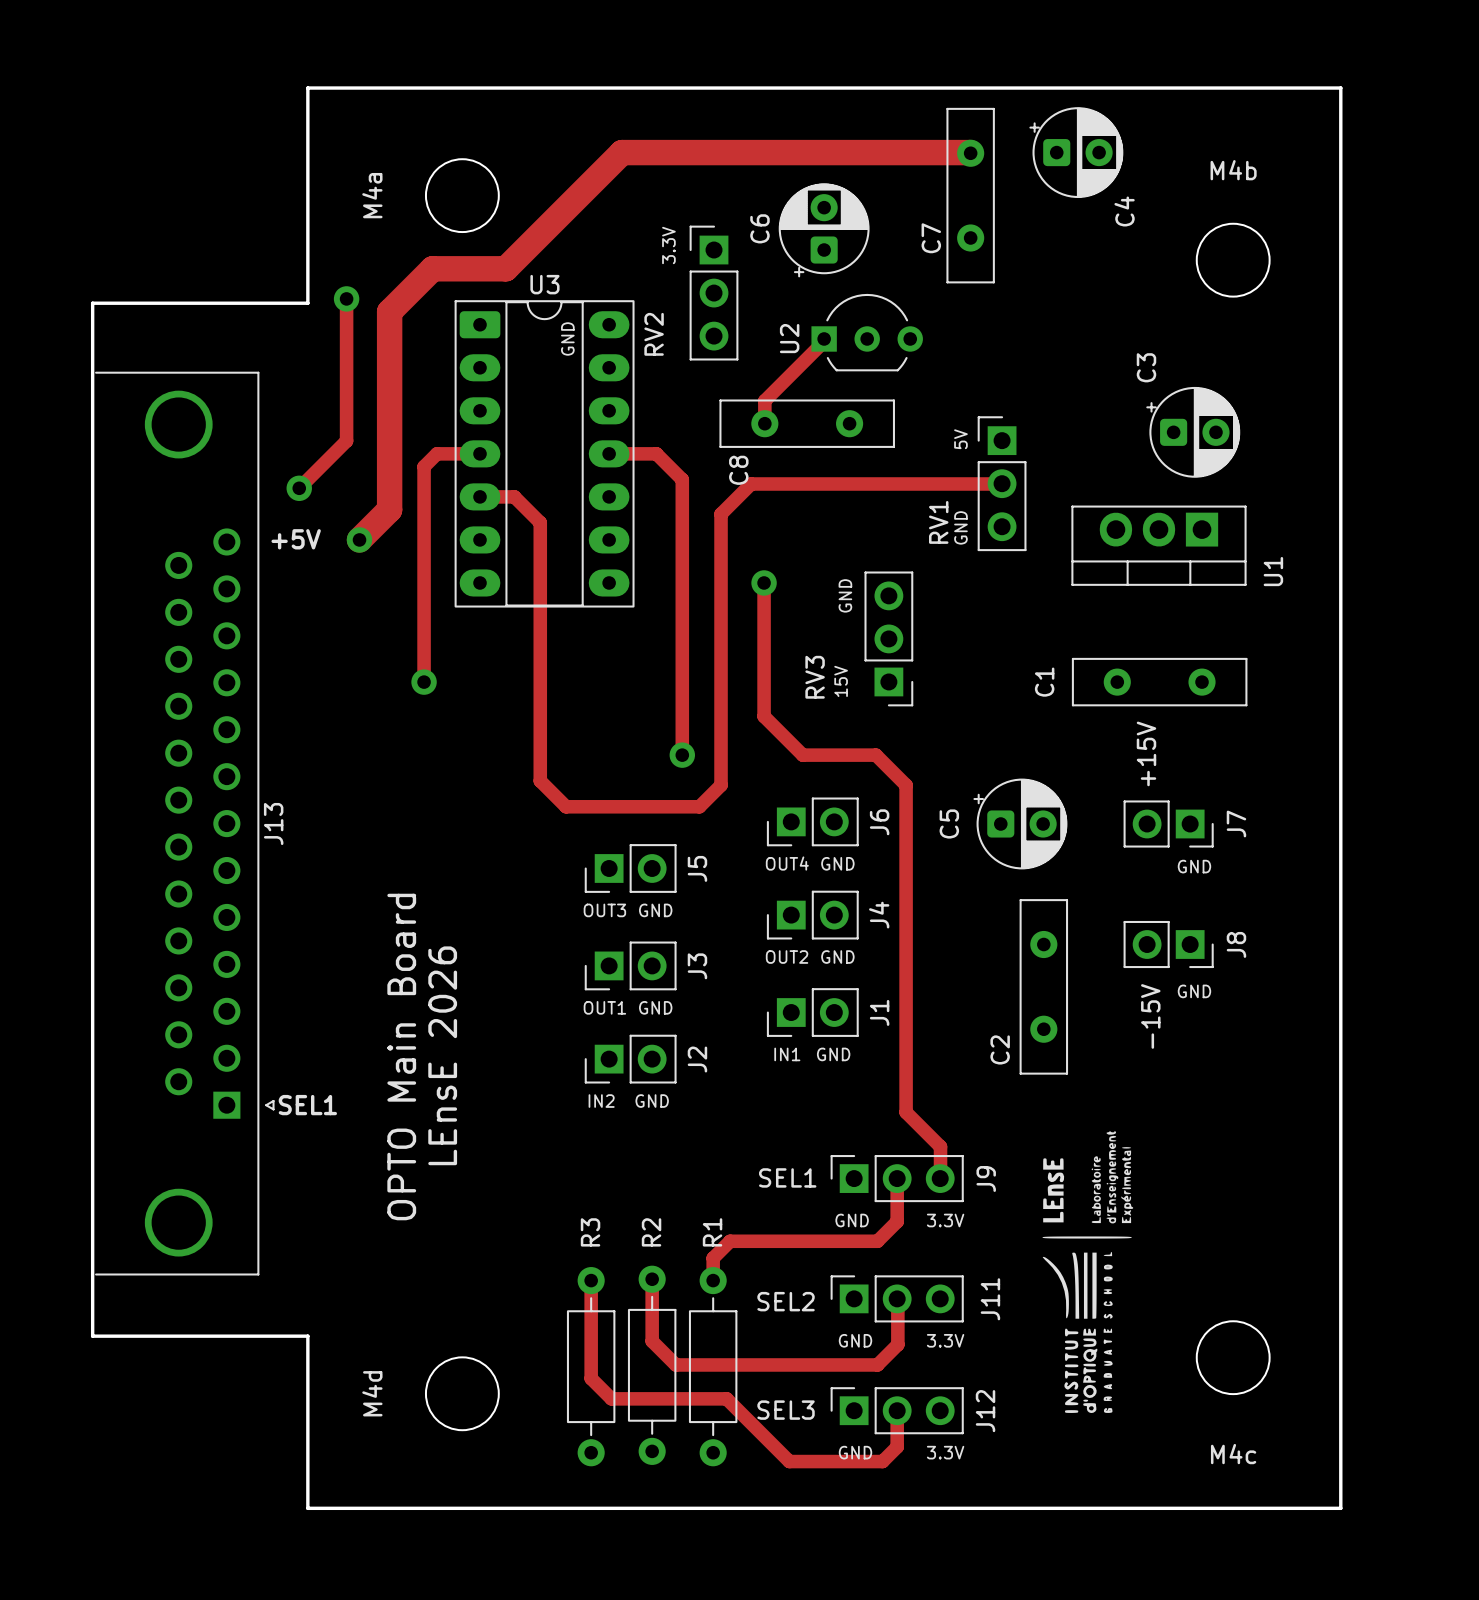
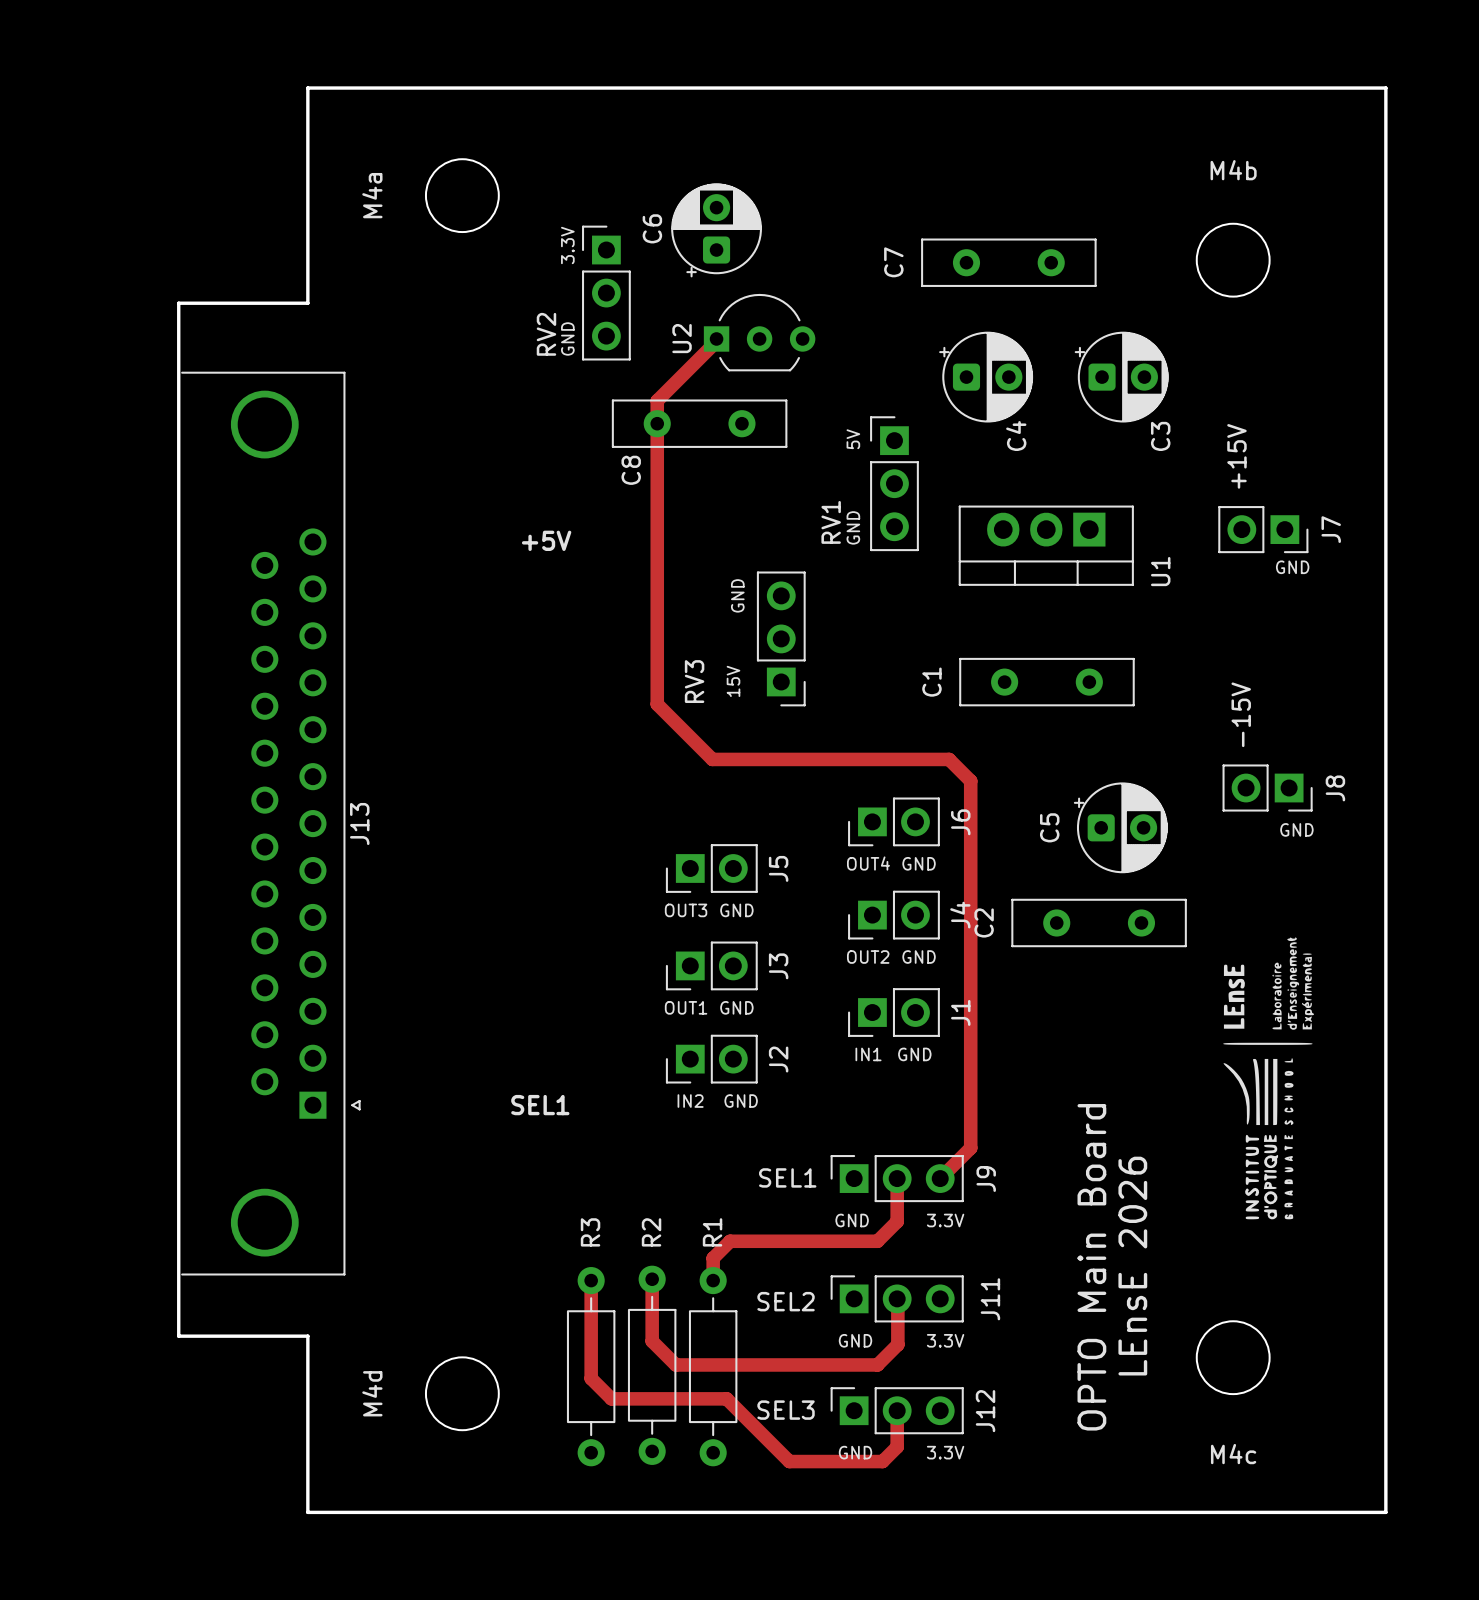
board edge: (1340, 88) (1340, 1508) (307, 1508) -> (1340, 88) (1385, 88) (1385, 1512) (307, 1512) (307, 1508)
track: (969, 152) (622, 152) (505, 268) (432, 268) (389, 311) (389, 509) (359, 539) -> none
C4 position: (1076, 152) -> (986, 377)
C7 rotation: 0° (970, 195) -> 90° clockwise (1008, 262)
C4 name position: C4 (1124, 211) -> C4 (1016, 436)
C6 position: (824, 230) -> (716, 230)
C7 name position: C7 (931, 238) -> C7 (893, 262)
text position: 3.3V (668, 245) -> 3.3V (567, 245)
RV2 position: (714, 293) -> (606, 293)
track: (346, 298) (346, 440) (299, 488) -> none
via: (346, 298) -> none
board edge: (178, 303) (92, 303) (92, 1336) (178, 1336) -> (178, 303) (178, 1336)
U2 position: (867, 332) -> (759, 332)
track: (824, 338) (824, 341) (764, 400) (764, 424) -> none
C3 name position: C3 (1146, 367) -> C3 (1160, 436)
C8 position: (807, 423) -> (699, 423)
C3 position: (1193, 432) -> (1121, 377)
text position: 5V (960, 439) -> 5V (853, 439)
track: (480, 453) (436, 453) (424, 466) (424, 682) -> none
U3: (544, 453) -> none
track: (609, 453) (656, 453) (682, 479) (682, 755) -> none
track: (1002, 483) (751, 483) (721, 514) (721, 785) (699, 806) (566, 806) (540, 780) (540, 522) (514, 496) (480, 496) -> none
RV1 position: (1002, 483) -> (894, 483)
via: (299, 488) -> none
text: none -> GND (853, 527)
text: GND (960, 527) -> none
text position: +5V (296, 539) -> +5V (546, 540)
via: (359, 539) -> none
U1 position: (1158, 545) -> (1046, 545)
text: none -> GND (1292, 567)
track: (764, 582) (764, 716) (802, 755) (875, 755) (906, 785) (906, 1112) (940, 1146) (940, 1178) -> (716, 338) (716, 341) (657, 400) (657, 704) (712, 759) (949, 759) (970, 781) (970, 1148) (940, 1178)
via: (764, 582) -> none
text: none -> GND (737, 595)
text: GND (845, 595) -> none
RV3 position: (888, 638) -> (781, 638)
RV3 name position: RV3 (815, 677) -> RV3 (694, 681)
text position: 15V (841, 681) -> 15V (733, 681)
via: (424, 682) -> none
C1 position: (1159, 682) -> (1046, 682)
text position: +15V (1146, 753) -> +15V (1236, 456)
via: (682, 755) -> none
J6 position: (812, 821) -> (893, 821)
J13 position: (184, 823) -> (270, 823)
C5 position: (1020, 824) -> (1120, 827)
J7 position: (1168, 824) -> (1263, 529)
text: none -> GND (1296, 829)
text position: OUT4 (787, 863) -> OUT4 (868, 863)
text: GND (837, 863) -> none
text: none -> GND (919, 863)
text: GND (1194, 866) -> none
J5 position: (630, 868) -> (711, 868)
text position: OUT3 (604, 910) -> OUT3 (686, 910)
text: GND (655, 910) -> none
text: none -> GND (736, 910)
J4 position: (812, 915) -> (893, 915)
J8 position: (1168, 944) -> (1267, 788)
text position: OUT2 (787, 957) -> OUT2 (868, 957)
text: GND (837, 957) -> none
text: none -> GND (919, 957)
J3 position: (630, 965) -> (711, 965)
C2 rotation: 0° (1043, 986) -> 90° clockwise (1099, 922)
text: GND (1194, 991) -> none
text position: OUT1 (604, 1007) -> OUT1 (686, 1007)
text: GND (655, 1007) -> none
text: none -> GND (736, 1007)
J1 position: (812, 1012) -> (893, 1012)
text position: -15V (1150, 1016) -> -15V (1241, 714)
C2 name position: C2 (1000, 1049) -> C2 (984, 922)
text position: IN1 (787, 1054) -> IN1 (868, 1054)
text: GND (833, 1054) -> none
text: none -> GND (914, 1054)
text: LEnsE 2026 (442, 1055) -> none
text: OPTO Main Board (401, 1057) -> none
J2 position: (630, 1059) -> (711, 1059)
text position: IN2 (601, 1101) -> IN2 (690, 1101)
text: GND (652, 1101) -> none
text: none -> GND (741, 1101)
text position: SEL1 (307, 1105) -> SEL1 (540, 1105)
text: none -> LEnsE 2026 (1132, 1266)
text: none -> OPTO Main Board (1091, 1267)
drawing position: (1087, 1271) -> (1268, 1078)

